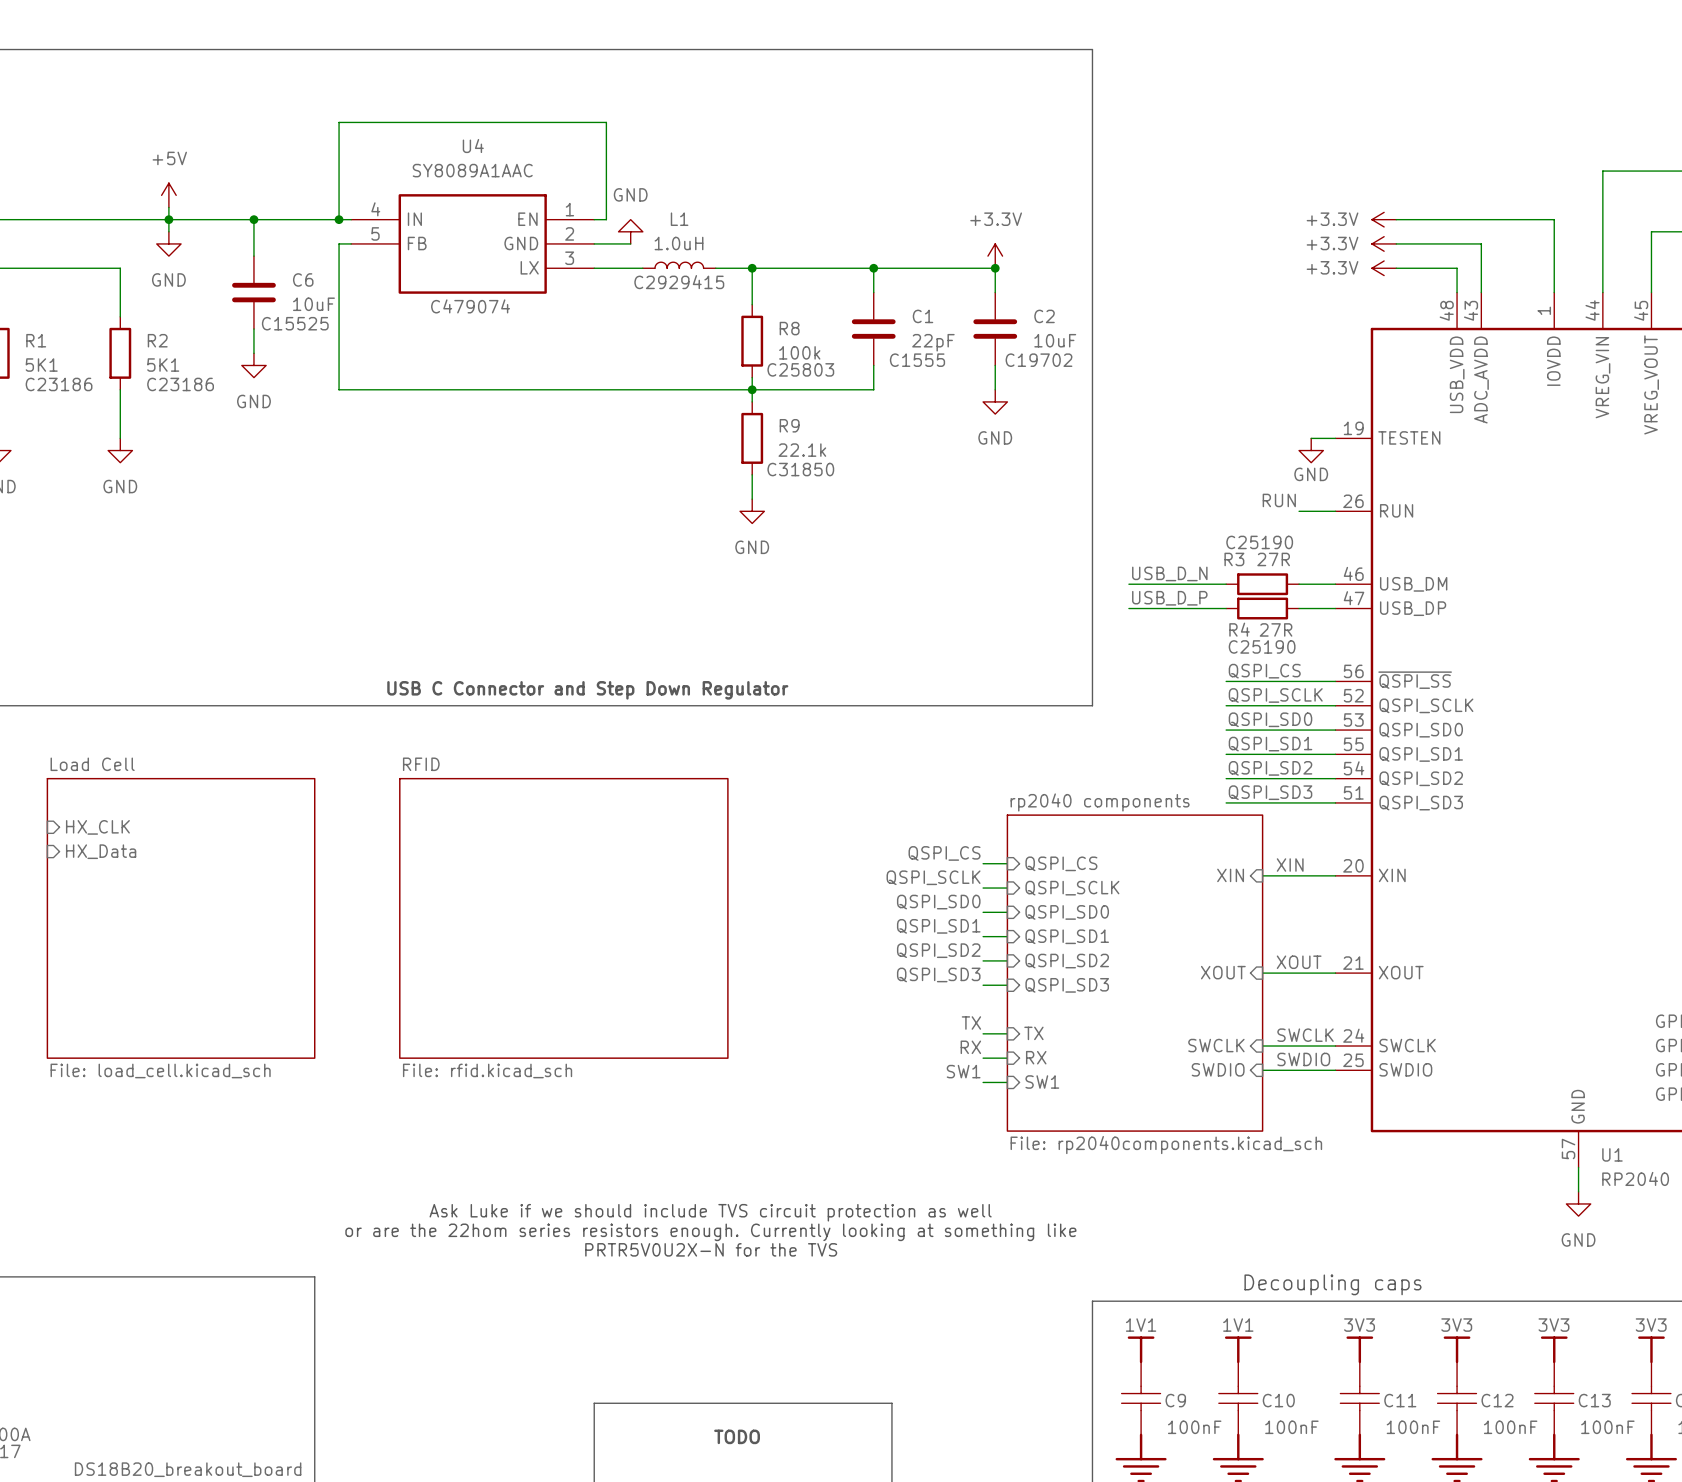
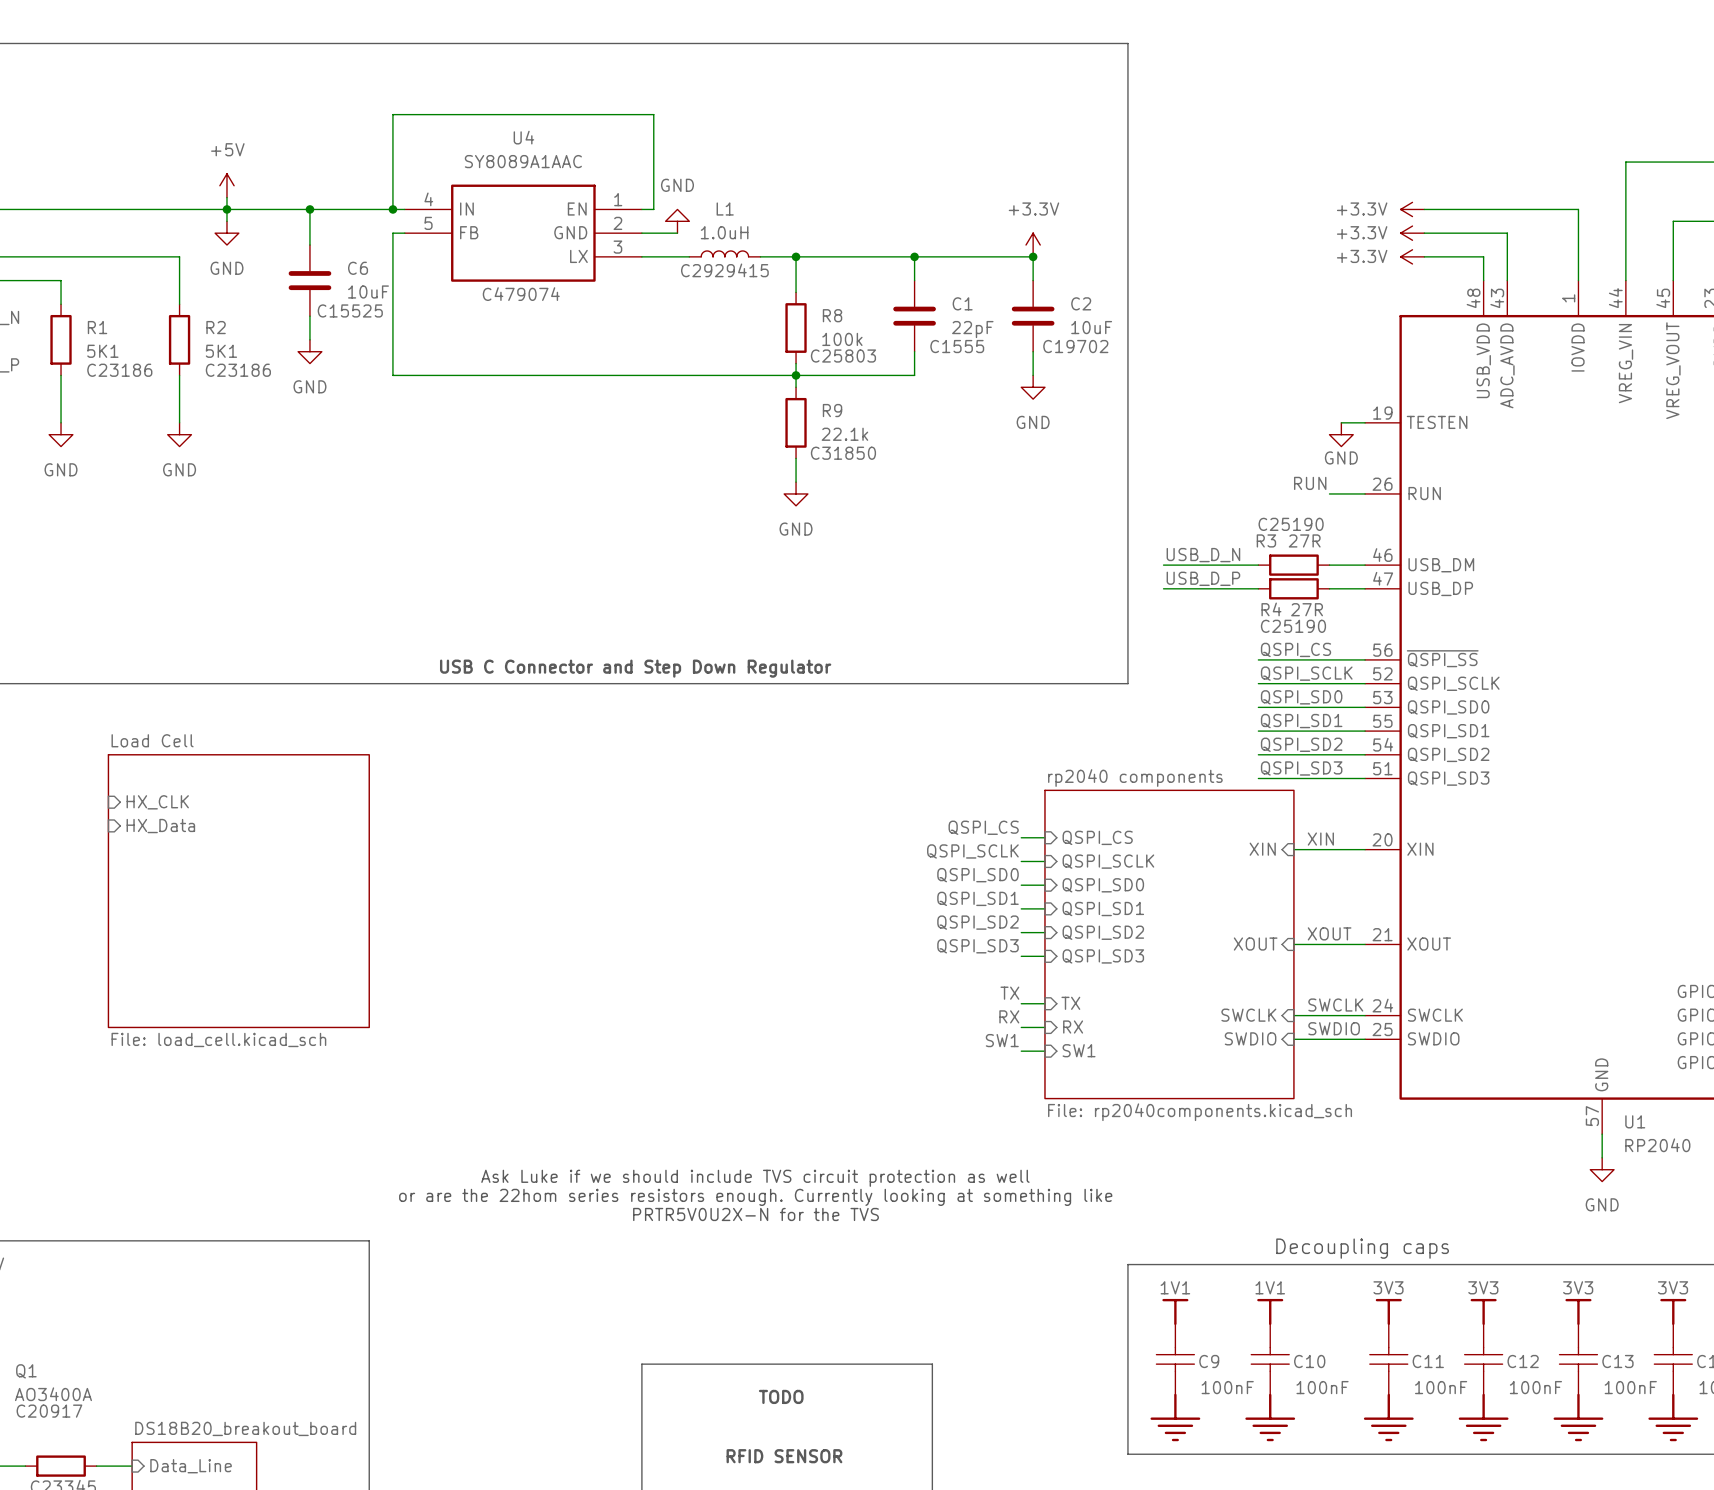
sheet RFID: File: rfid.kicad_sch (563, 918) -> none

